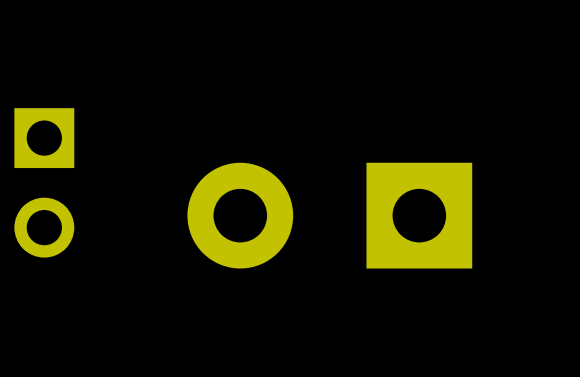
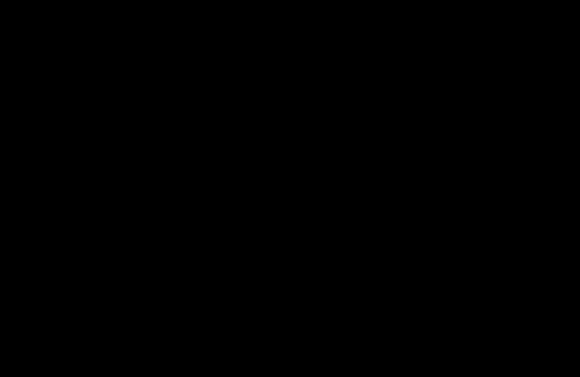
part: (44, 182) -> none
part: (329, 215) -> none

